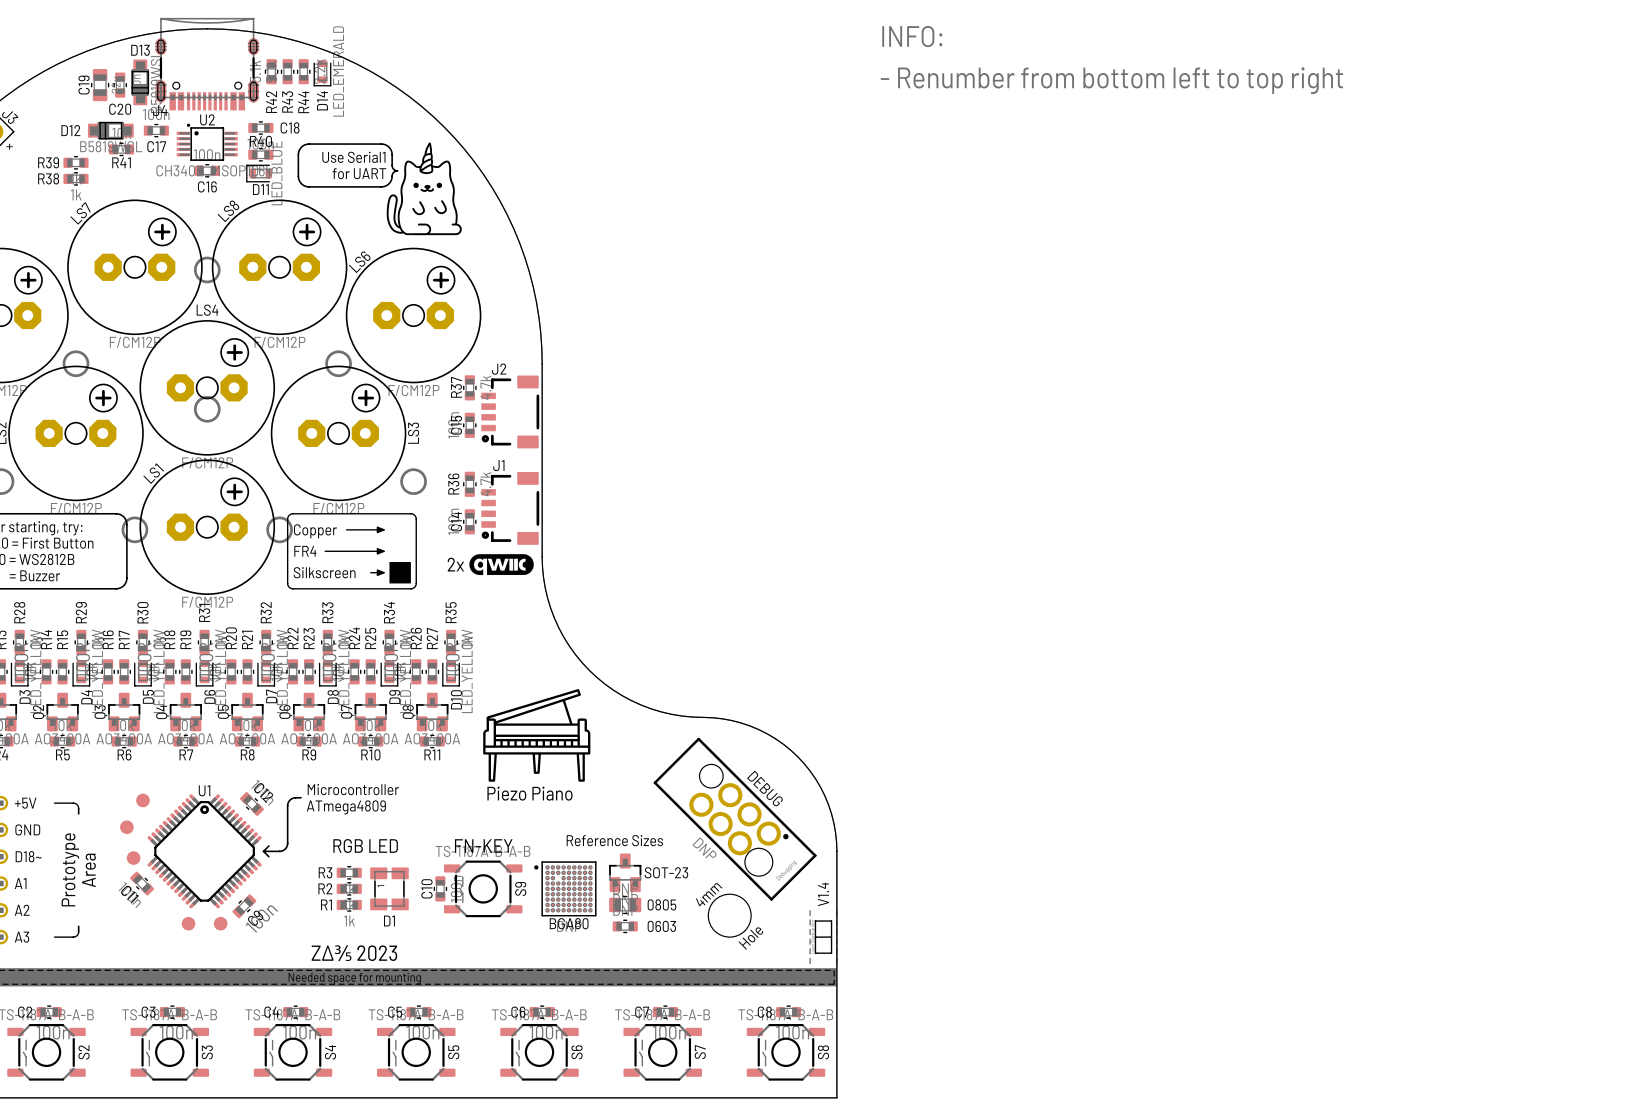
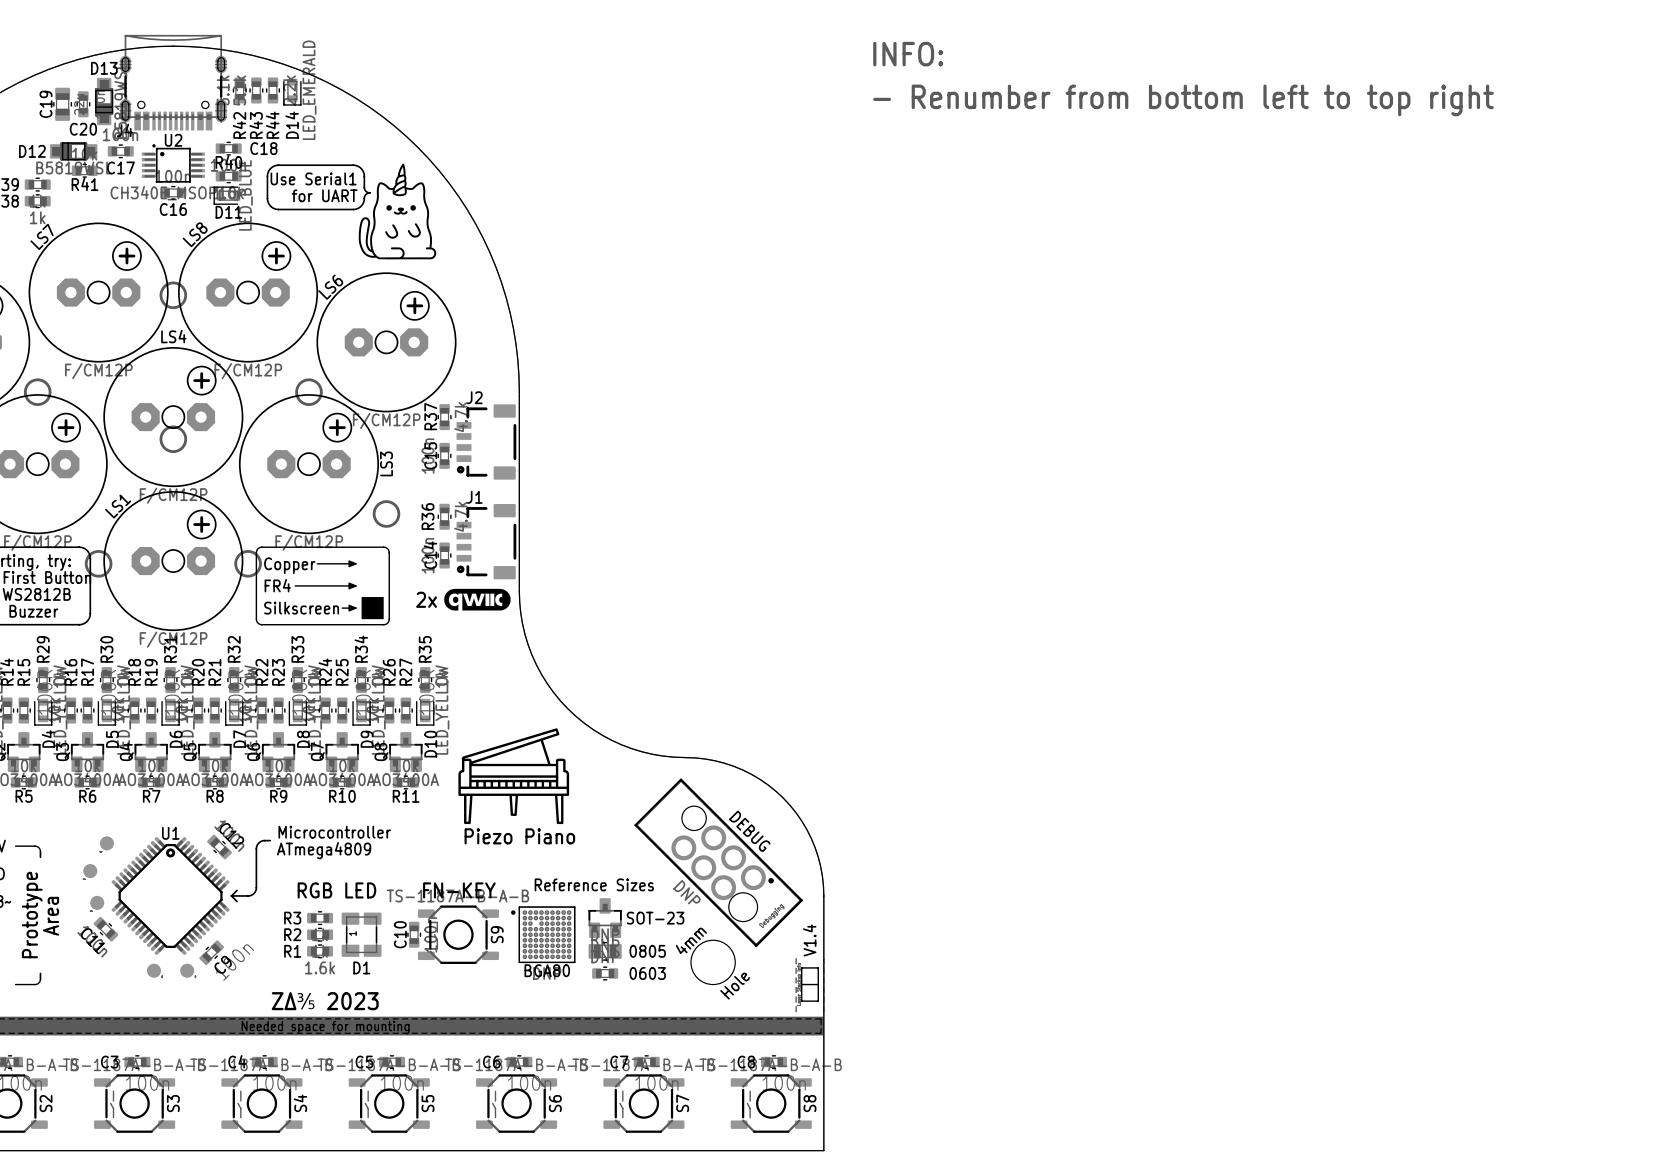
R1 value: 1k (349, 921) -> 1.6k (320, 967)

